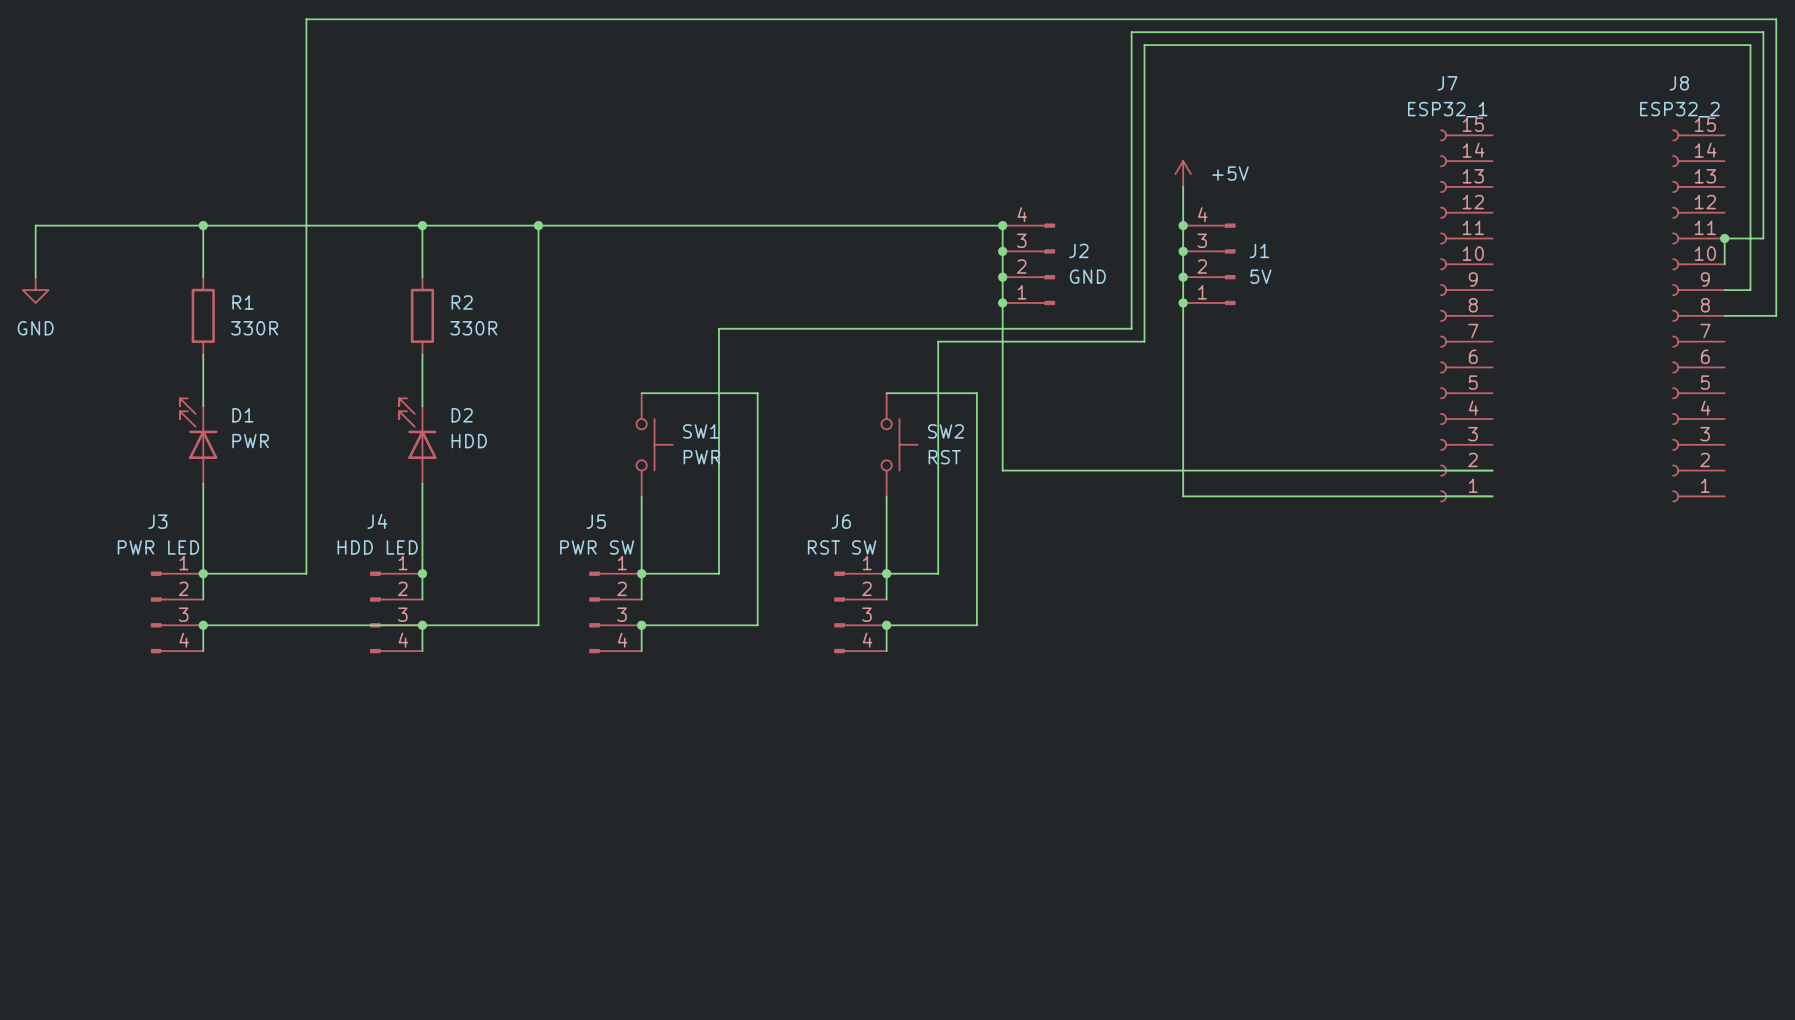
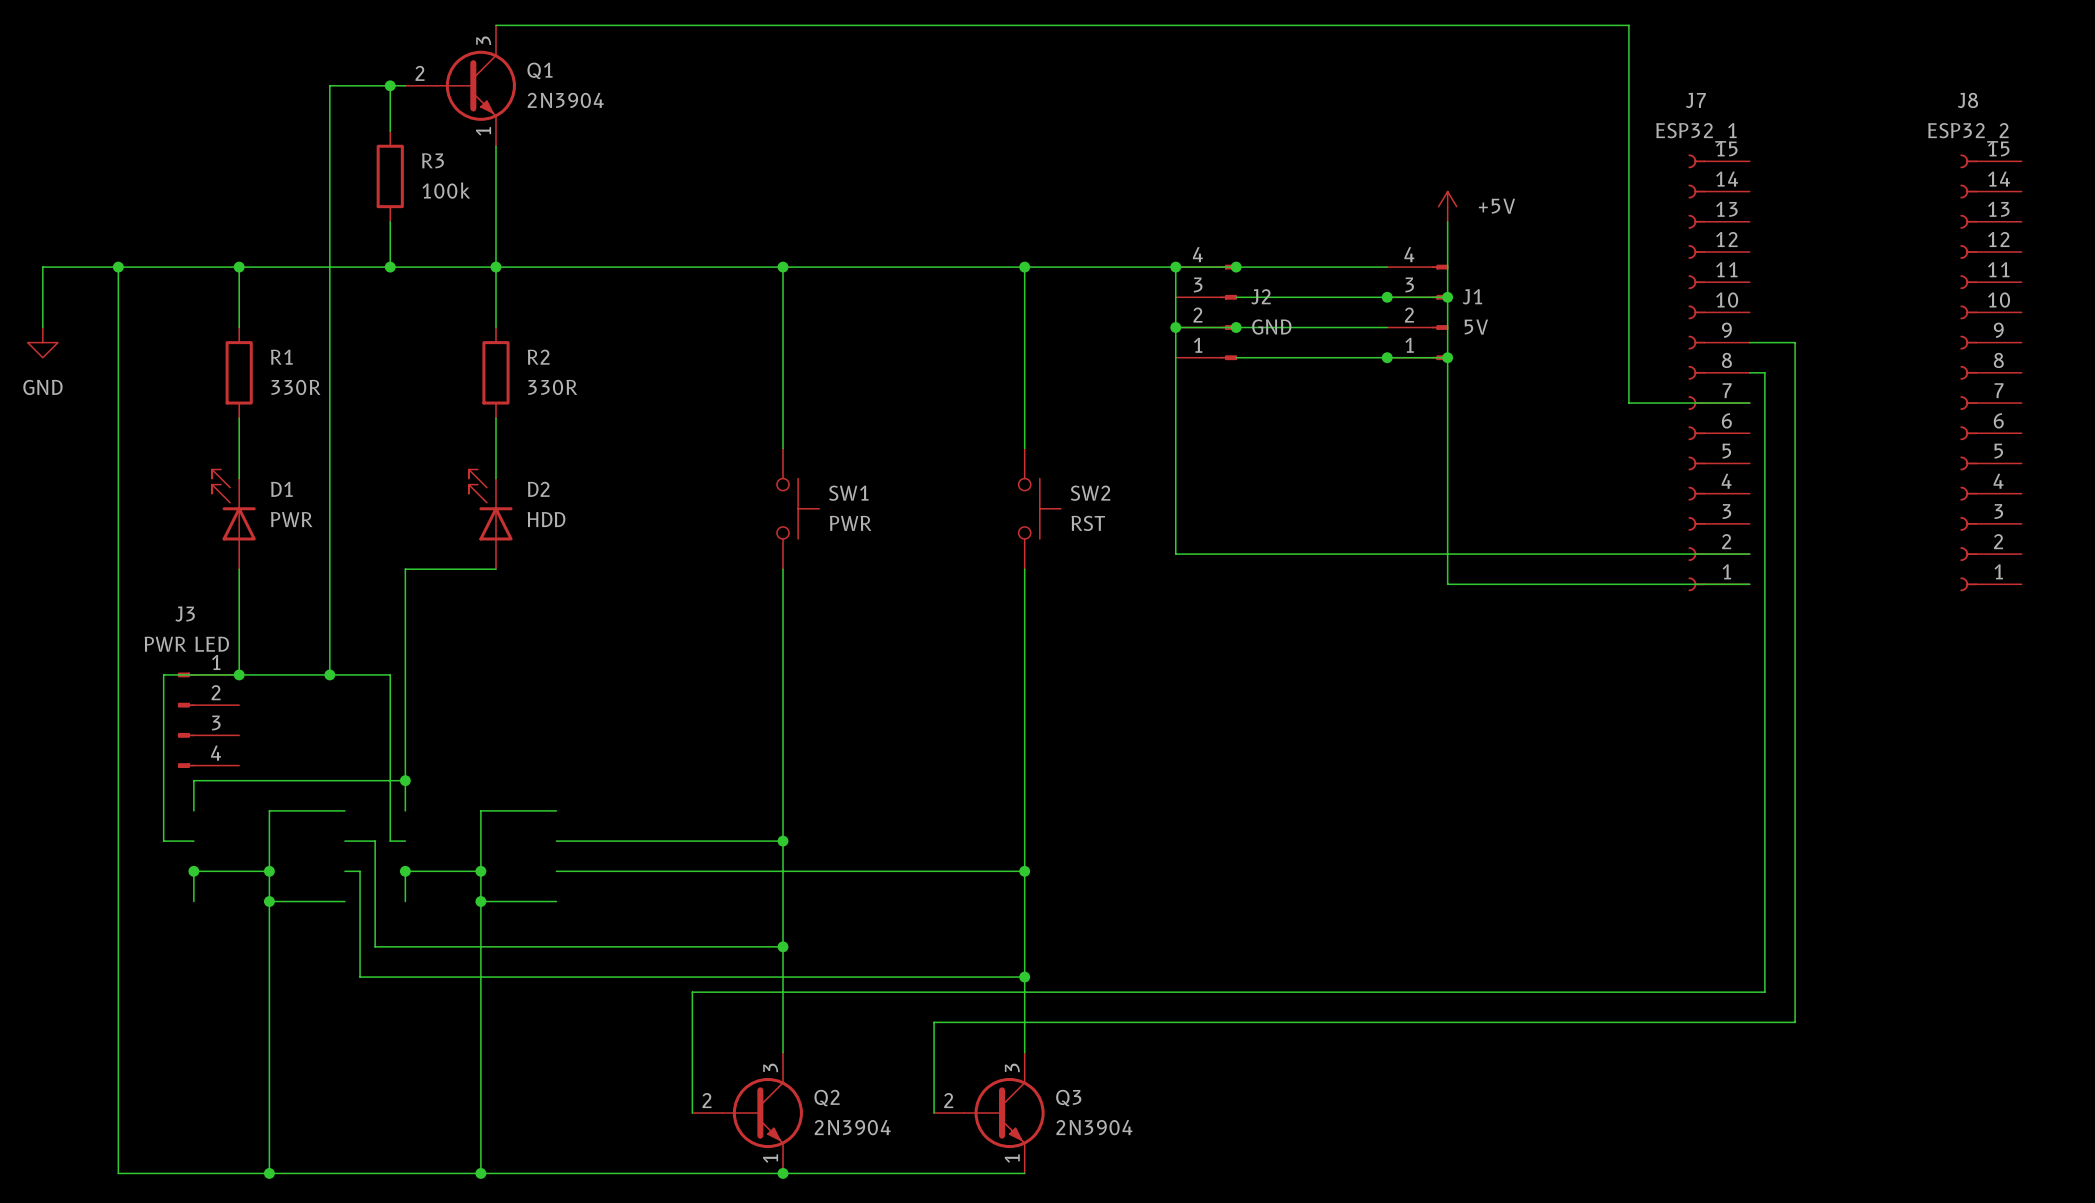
wire: (422, 19) (306, 19) (306, 573) -> (405, 841) (390, 841) (390, 674) (360, 674)
wire: (1389, 19) (1776, 19) (1776, 315) (1724, 315) -> (1628, 25) (1628, 403) (1749, 403)
wire: none -> (390, 85) (390, 131)
junction: none -> (390, 85)
wire: none -> (405, 85) (329, 85) (329, 674)
Q1: none -> 2N3904 (460, 85)
wire: none -> (495, 146) (495, 267)
R3: none -> 100k (390, 176)
power symbol position: +5V (1183, 174) -> +5V (1447, 206)
wire: none -> (390, 221) (390, 267)
wire: (1183, 186) (1183, 496) (1234, 496) -> (1447, 221) (1447, 584)
wire: none -> (118, 267) (118, 1173) (1024, 1173)
junction: none -> (118, 267)
junction: none -> (390, 267)
wire: (538, 225) (538, 625) (203, 625) (203, 651) -> none
junction: (538, 225) -> none
wire: none -> (783, 267) (783, 448)
junction: none -> (783, 267)
wire: none -> (1024, 267) (1024, 448)
junction: none -> (1024, 267)
wire: none -> (1175, 267) (1387, 267)
junction: none -> (1236, 267)
junction: (1183, 225) -> none
junction: (1724, 238) -> none
junction: (1002, 251) -> none
wire: none -> (1236, 297) (1447, 297)
junction: none -> (1447, 297)
wire: (1724, 264) (1724, 238) (1763, 238) (1763, 32) (1131, 32) (1131, 328) (719, 328) (719, 573) (641, 573) -> none
wire: none -> (1175, 327) (1387, 327)
junction: none -> (1236, 327)
junction: (1183, 277) -> none
wire: none -> (1749, 342) (1795, 342) (1795, 1022) (934, 1022) (934, 1113)
wire: (1724, 290) (1750, 290) (1750, 45) (1144, 45) (1144, 341) (938, 341) (938, 573) (886, 573) -> none
junction: (1002, 302) -> none
wire: none -> (1236, 357) (1447, 357)
junction: none -> (1447, 357)
wire: none -> (1749, 372) (1764, 372) (1764, 992) (692, 992) (692, 1113)
wire: (641, 393) (757, 393) (757, 625) (641, 625) (641, 651) -> none
wire: (886, 393) (976, 393) (976, 625) (886, 625) (886, 651) -> none
SW1 position: (654, 444) -> (798, 508)
SW2 position: (899, 444) -> (1039, 508)
wire: (422, 483) (422, 599) -> (495, 569) (405, 569) (405, 810)
wire: none -> (783, 569) (783, 1052)
wire: none -> (1024, 569) (1024, 1052)
wire: (641, 496) (641, 599) -> none
wire: (886, 496) (886, 599) -> none
wire: (203, 573) (203, 599) -> (239, 674) (163, 674) (163, 841) (193, 841)
junction: none -> (329, 674)
junction: (422, 573) -> none
junction: (641, 573) -> none
junction: (886, 573) -> none
J4: HDD LED (396, 612) -> none
J5: PWR SW (615, 612) -> none
J6: RST SW (860, 612) -> none
junction: (203, 625) -> none
wire: (422, 625) (422, 651) -> none
junction: (422, 625) -> none
junction: (641, 625) -> none
junction: (886, 625) -> none
wire: none -> (405, 780) (193, 780) (193, 810)
junction: none -> (405, 780)
wire: none -> (344, 810) (269, 810) (269, 1173)
wire: none -> (556, 810) (480, 810) (480, 1173)
wire: none -> (344, 841) (375, 841) (375, 946) (783, 946)
wire: none -> (556, 841) (783, 841)
junction: none -> (783, 841)
junction: none -> (193, 871)
wire: none -> (269, 871) (193, 871) (193, 901)
junction: none -> (269, 871)
wire: none -> (344, 871) (360, 871) (360, 977) (1024, 977)
junction: none -> (405, 871)
wire: none -> (480, 871) (405, 871) (405, 901)
junction: none -> (480, 871)
wire: none -> (556, 871) (1024, 871)
junction: none -> (1024, 871)
wire: none -> (269, 901) (344, 901)
junction: none -> (269, 901)
wire: none -> (480, 901) (556, 901)
junction: none -> (480, 901)
junction: none -> (783, 946)
junction: none -> (1024, 977)
Q2: none -> 2N3904 (747, 1113)
Q3: none -> 2N3904 (989, 1113)
junction: none -> (269, 1173)
junction: none -> (480, 1173)
junction: none -> (783, 1173)

